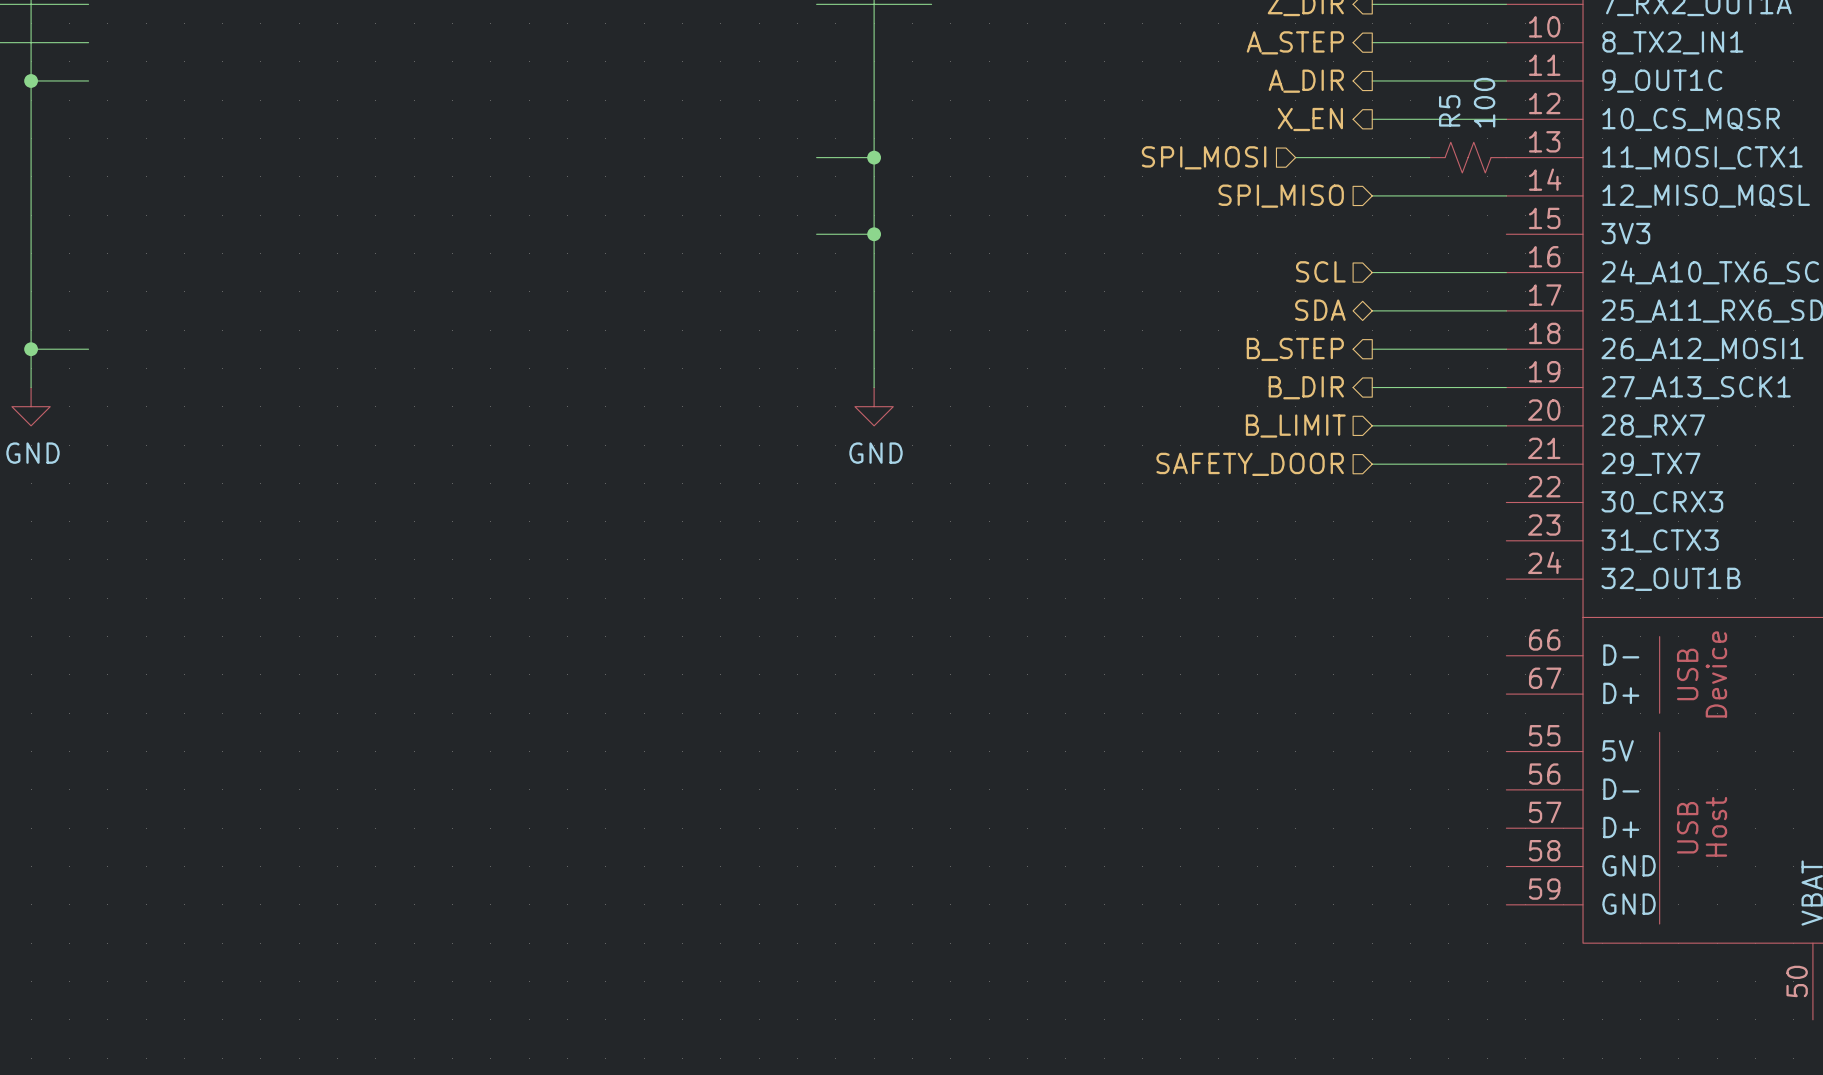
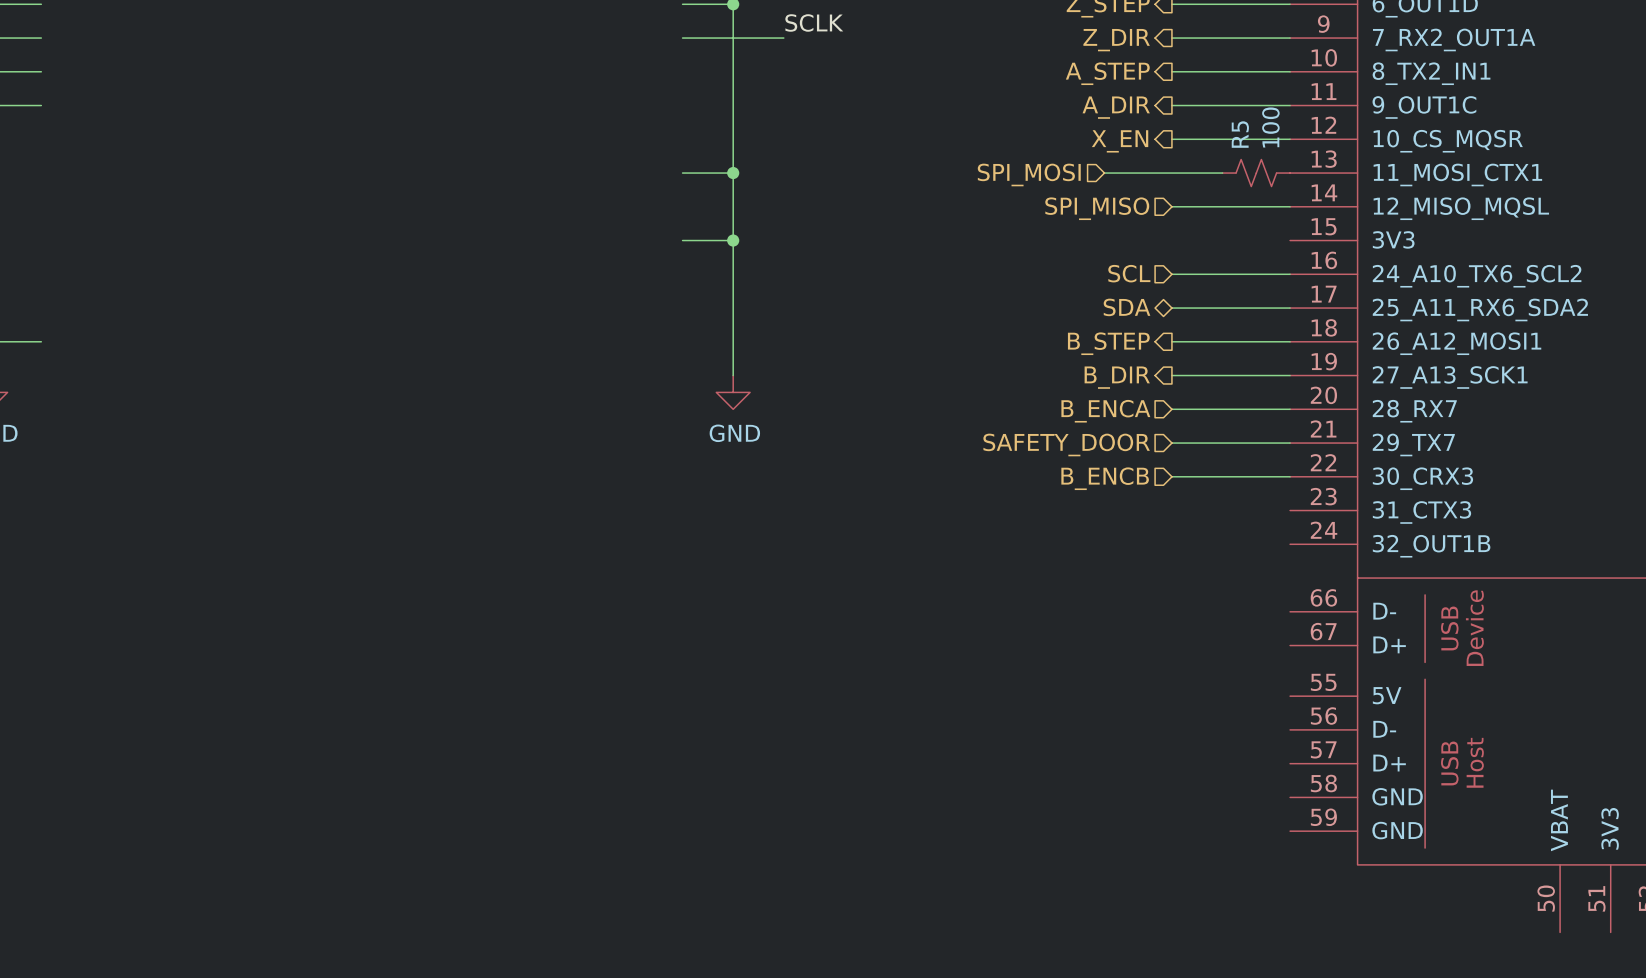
hierarchical label: B_LIMIT (1295, 426) -> B_ENCA (1105, 411)
hierarchical label: none -> B_ENCB (1105, 478)
wire: none -> (1171, 476) (1290, 476)

